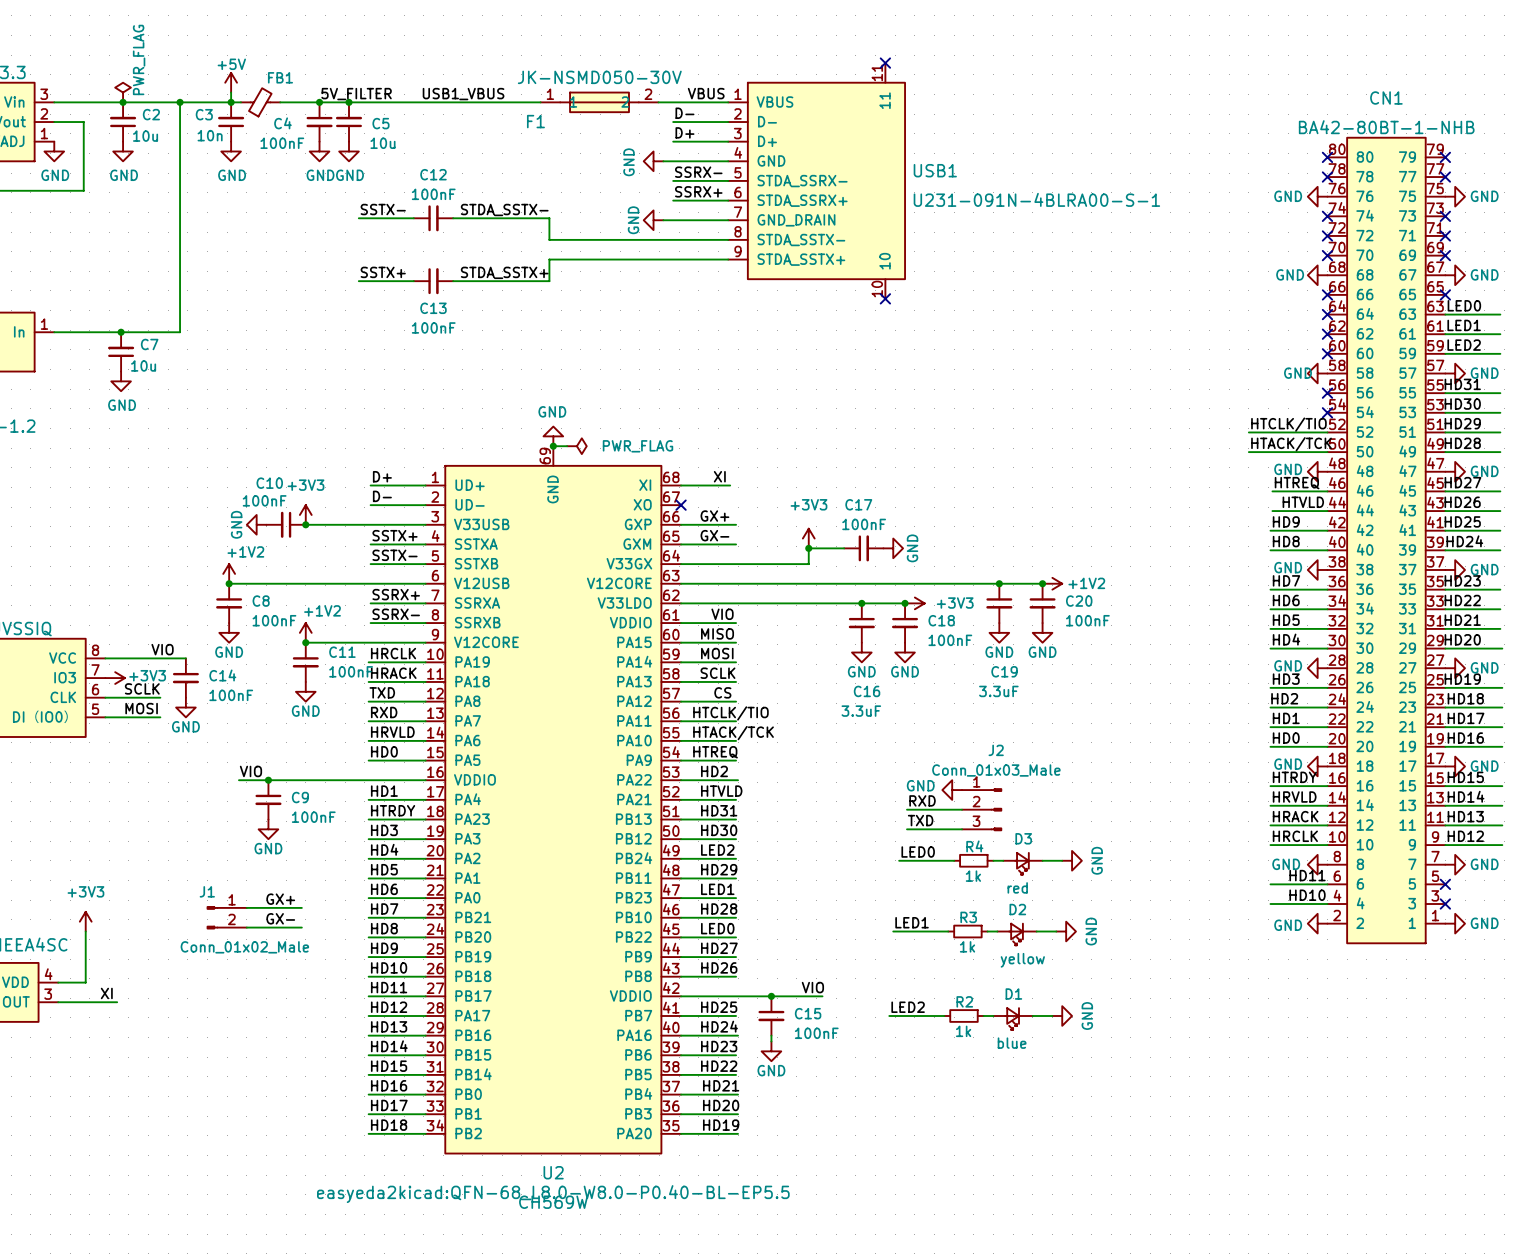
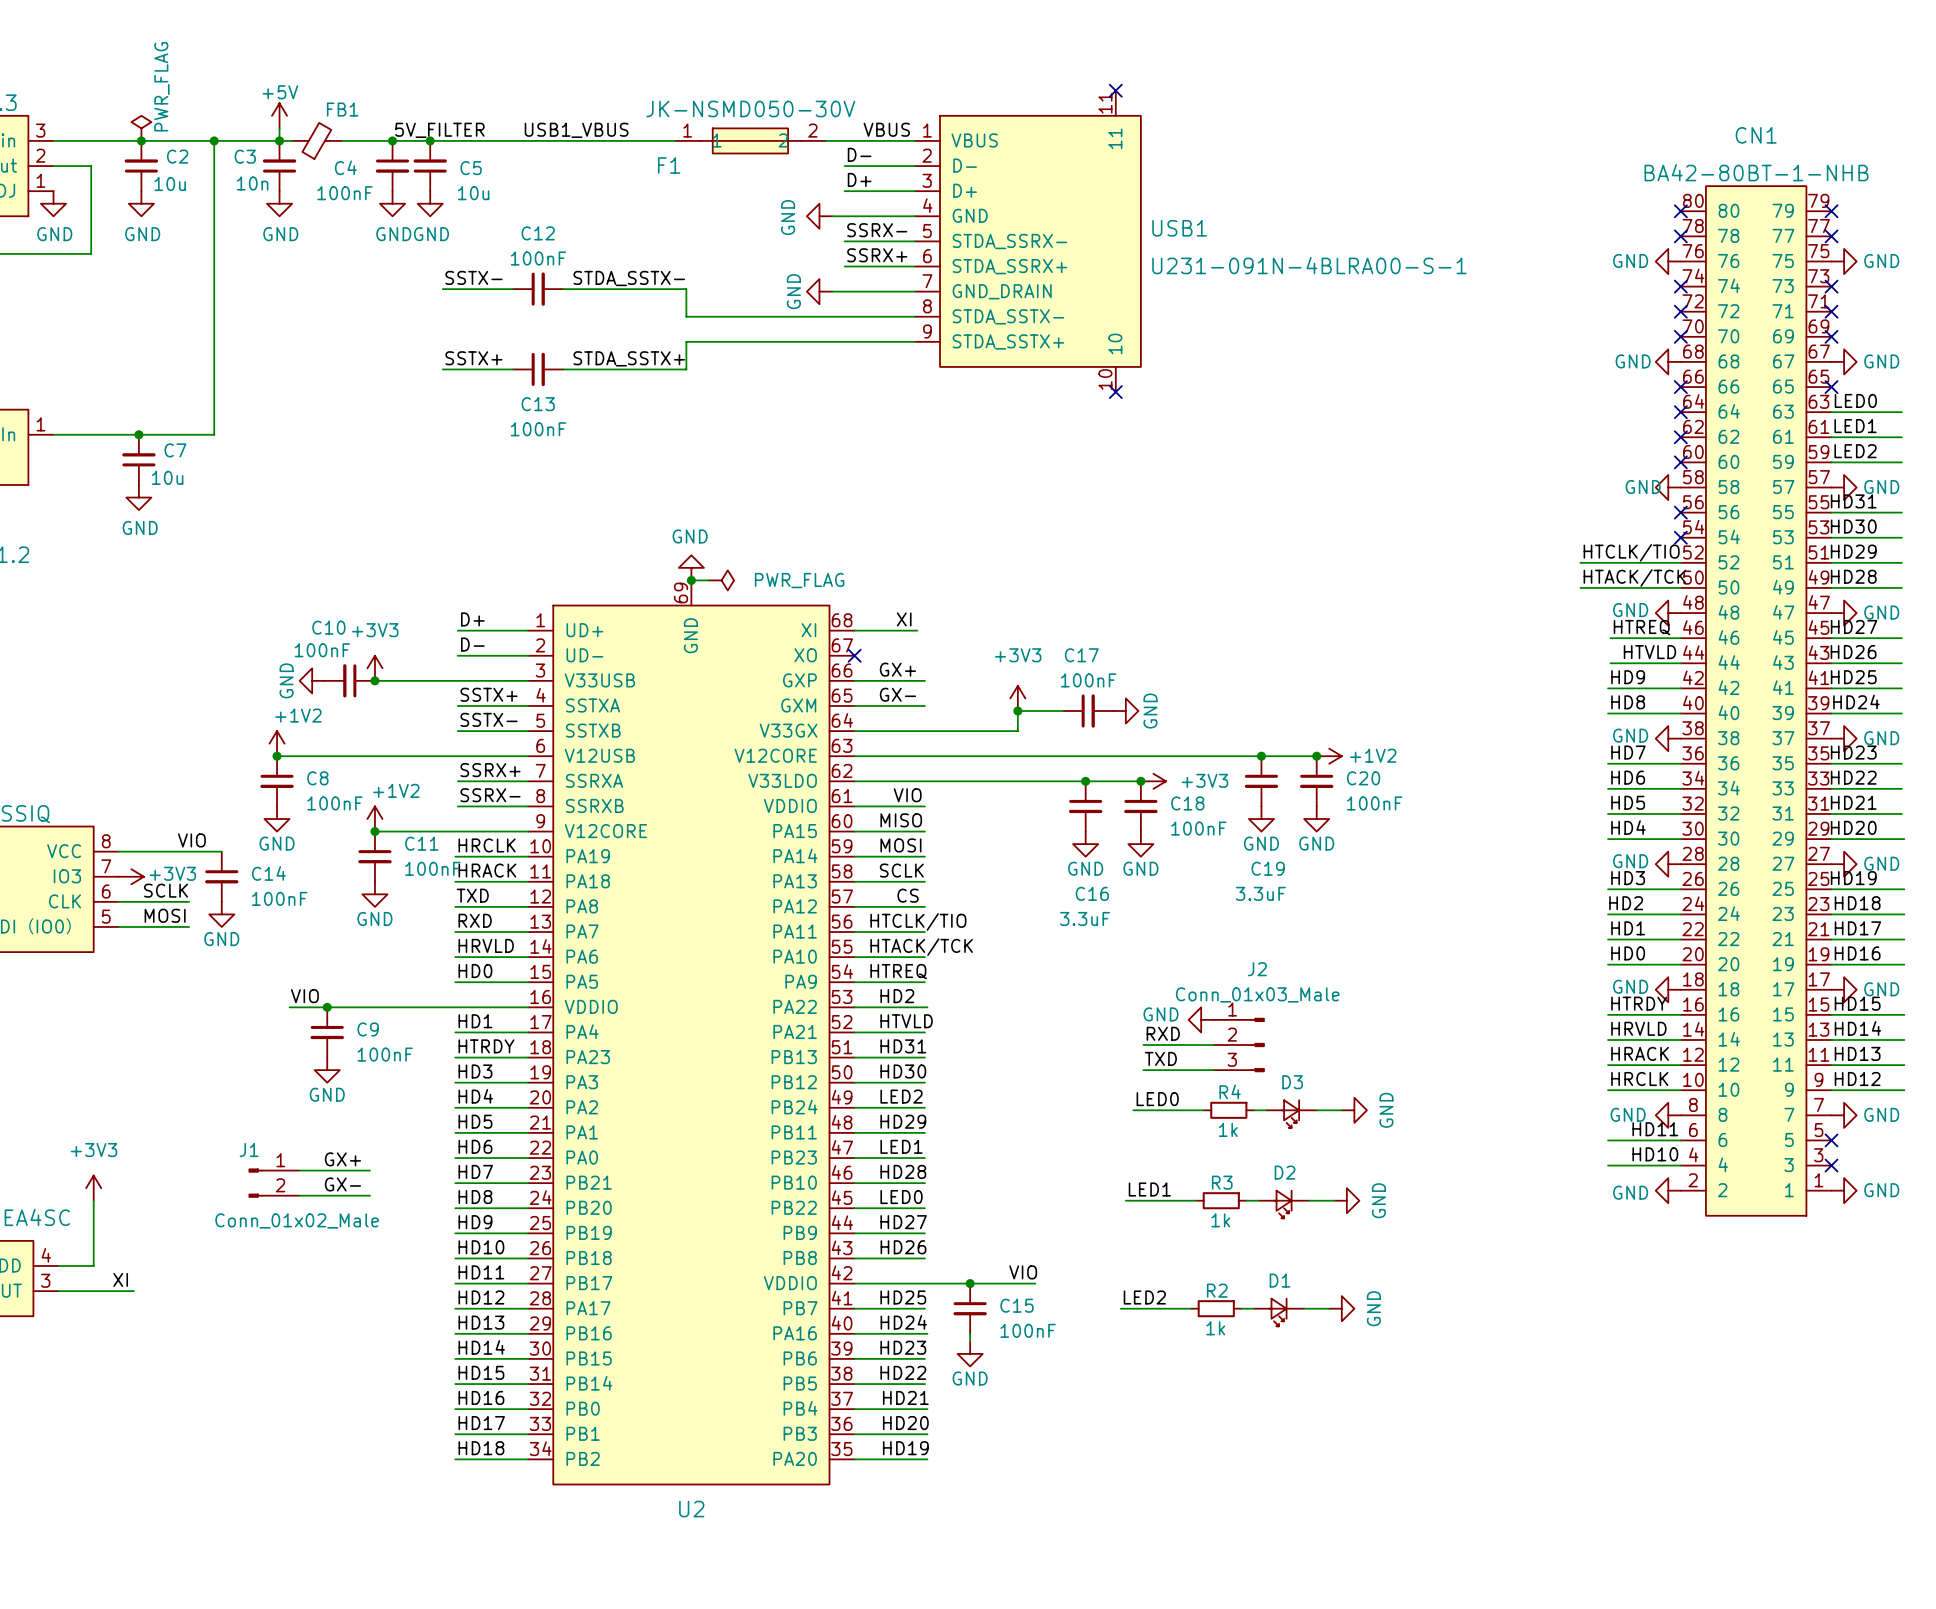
D3 value: red (1017, 887) -> none
D2 value: yellow (1022, 960) -> none
D1 value: blue (1012, 1043) -> none
U2 text: easyeda2kicad:QFN-68_L8.0-W8.0-P0.40-BL-EP5.5 (553, 1194) -> none
U2 value: CH569W (553, 1202) -> none

